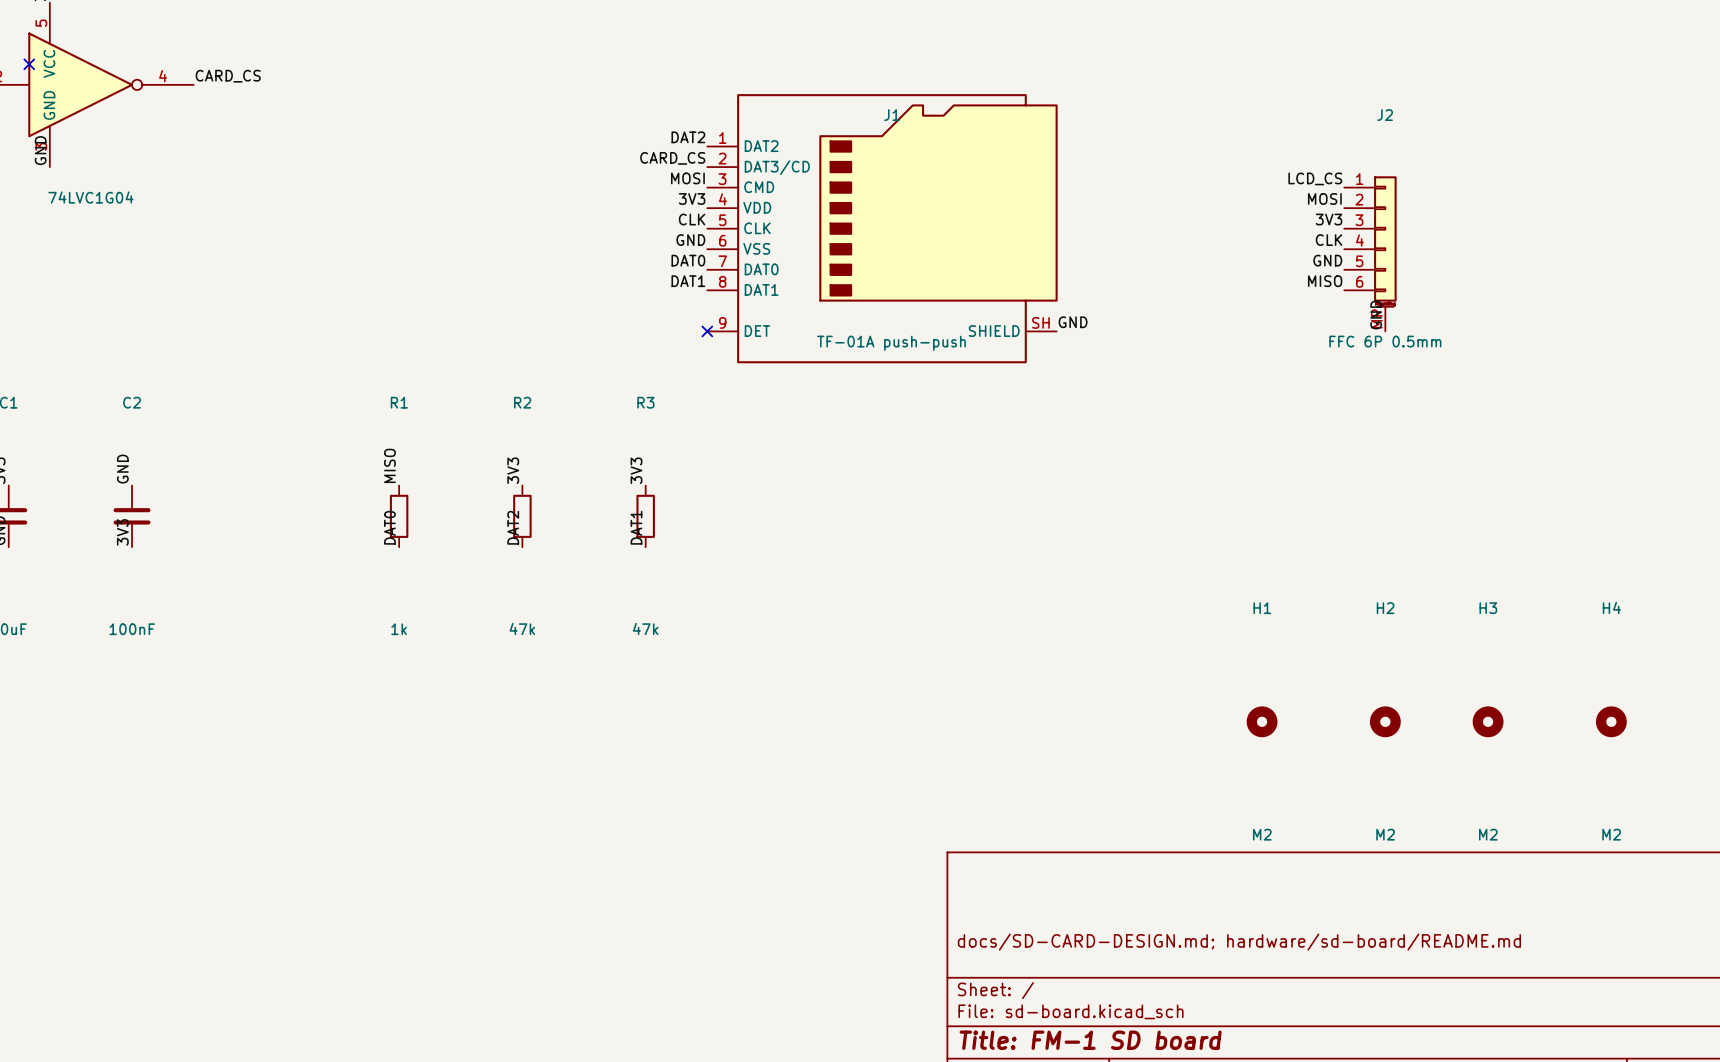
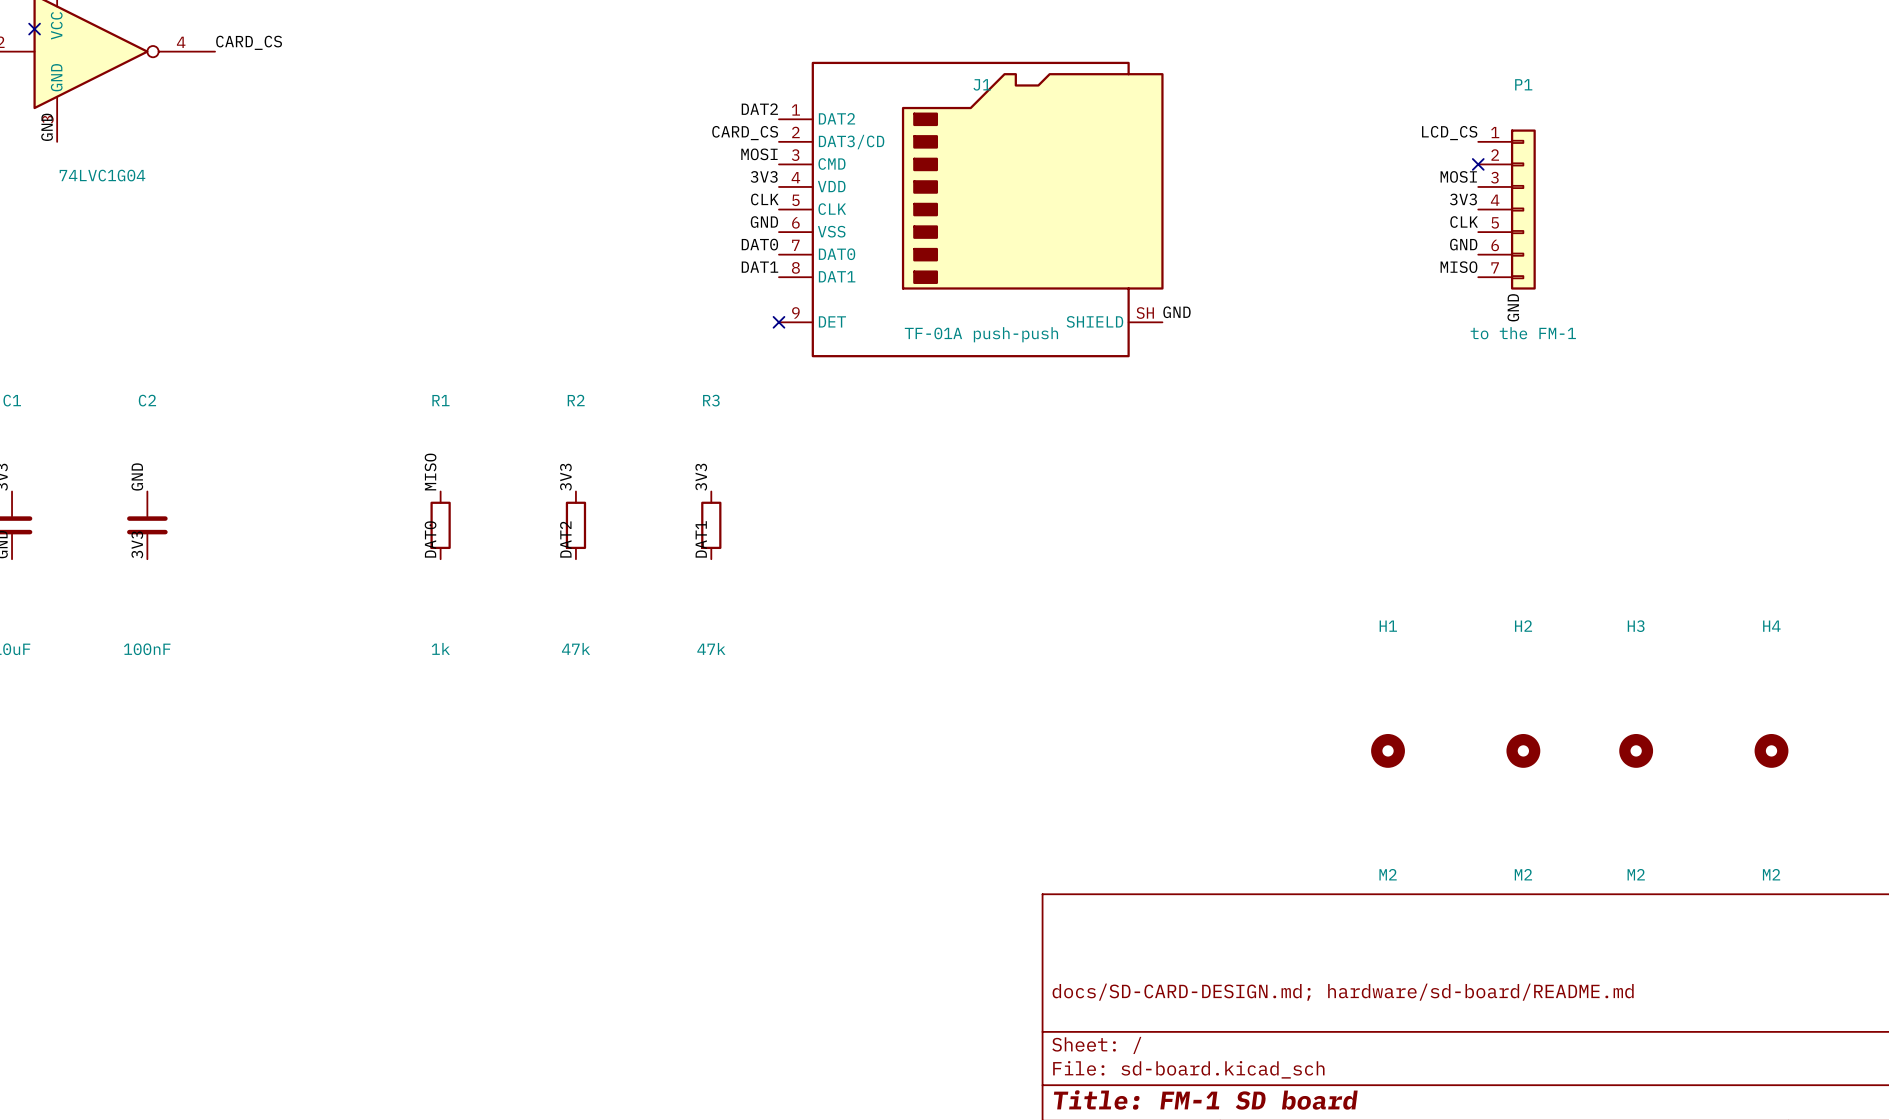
label position: LCD_CS (1315, 178) -> LCD_CS (1449, 133)
no-connect mark: none -> (1478, 164)
P1: none -> to the FM-1 (1507, 209)
J2: FFC 6P 0.5mm (1370, 253) -> none

